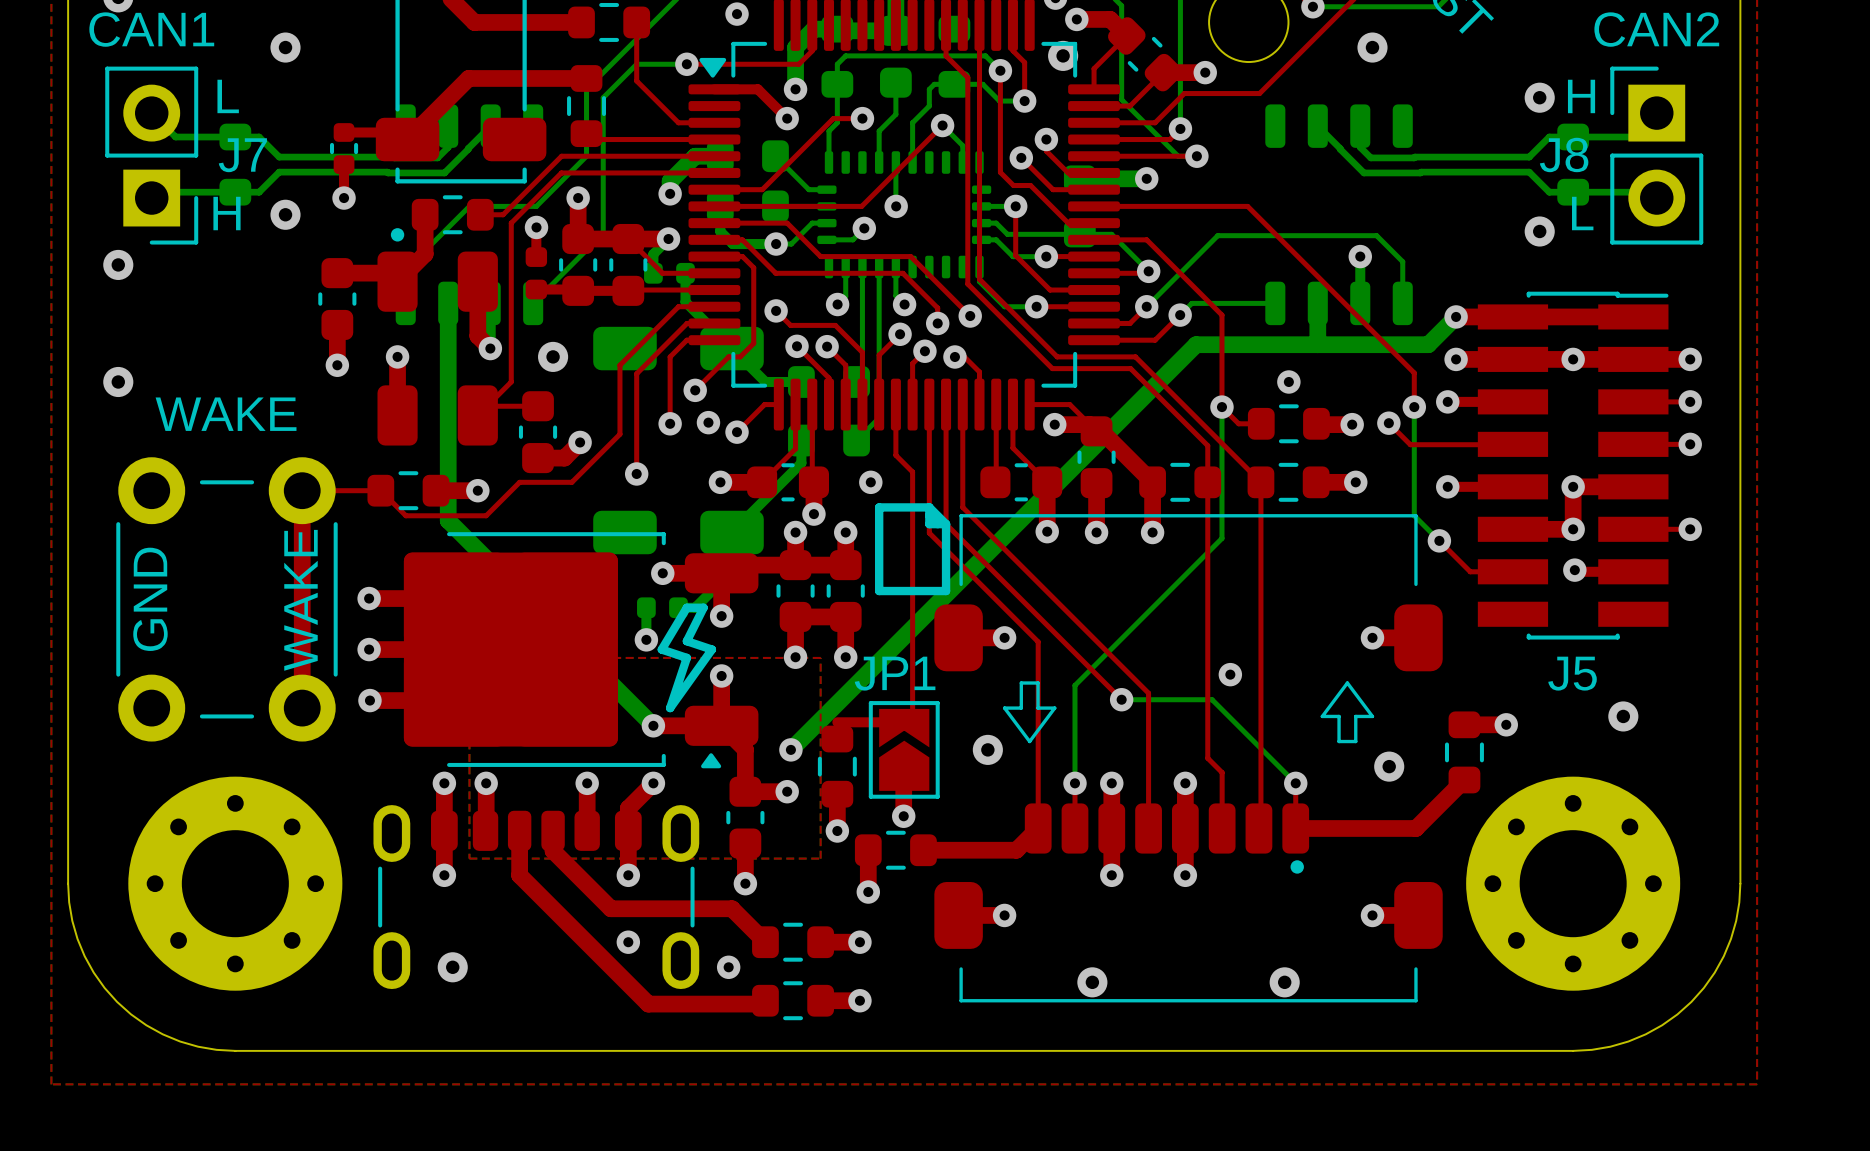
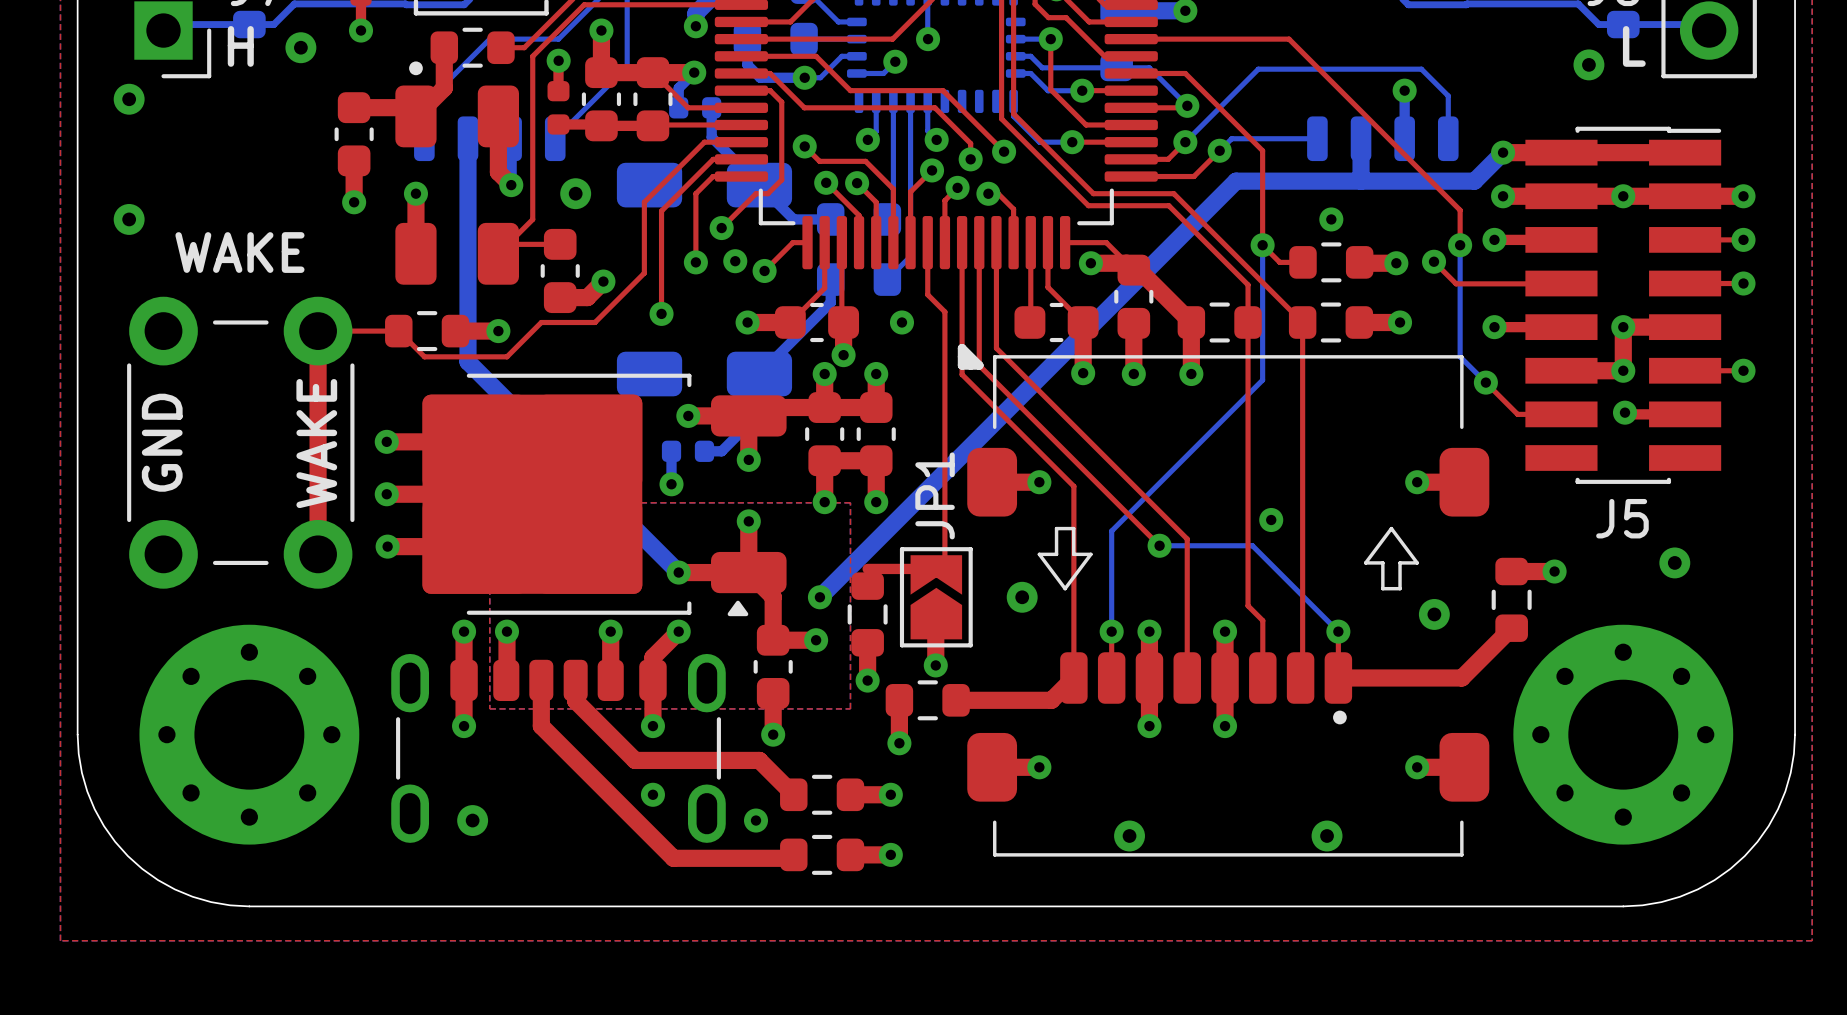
line: (929, 507) (879, 507) (879, 591) (946, 591) (946, 524) -> none
line: (686, 607) (703, 607) (686, 641) (711, 649) (670, 708) (686, 657) (661, 649) (686, 607) -> none
JP1 name rotation: 0° (895, 673) -> 90° counterclockwise (935, 495)

